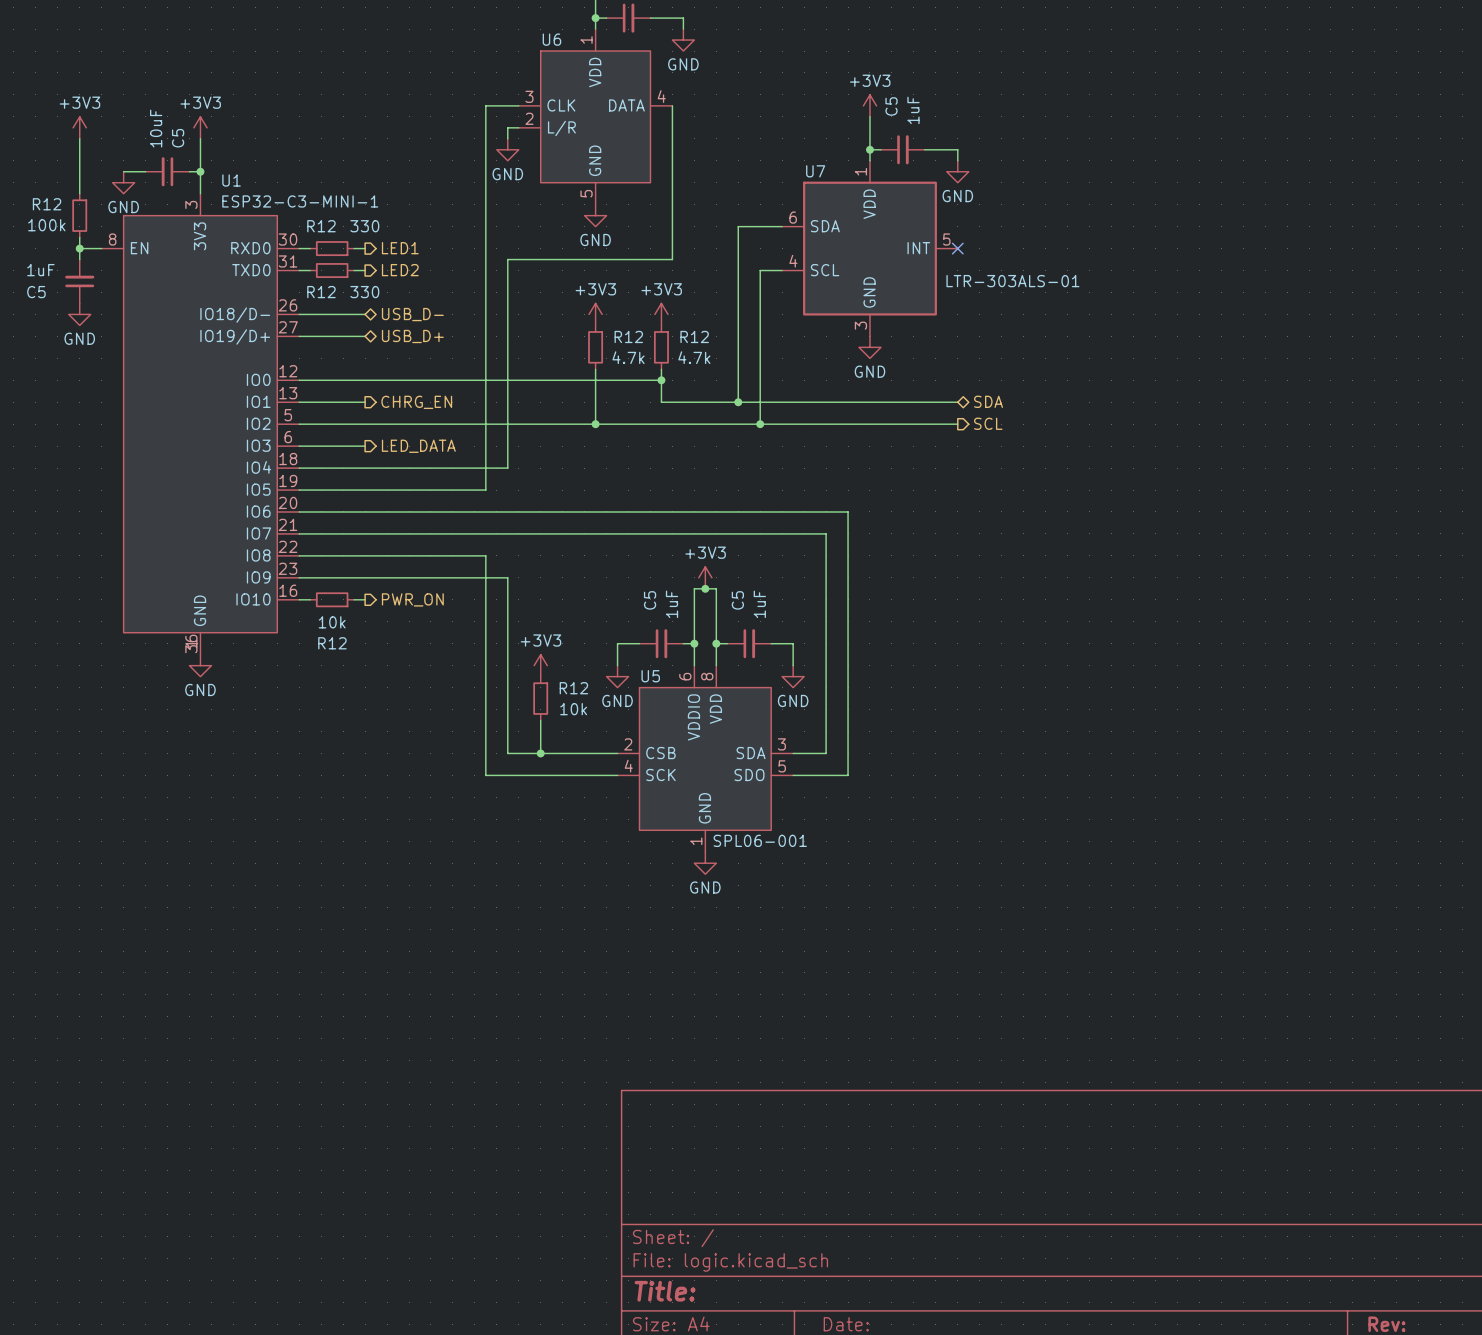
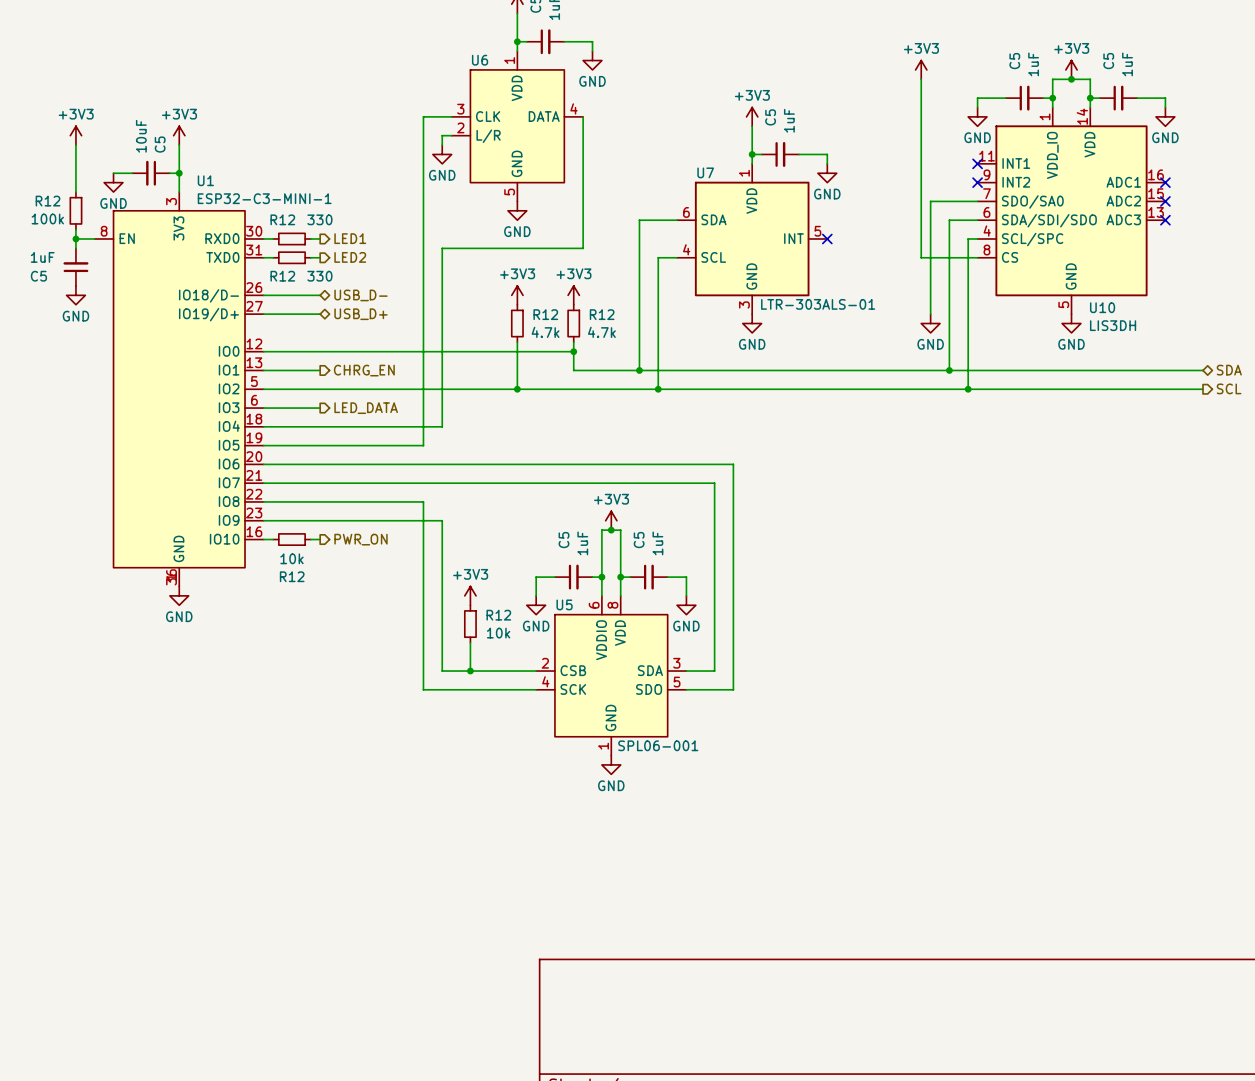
power symbol: none -> +3V3 (921, 69)
power symbol: none -> +3V3 (1071, 69)
wire: none -> (921, 79) (921, 257) (977, 257)
junction: none -> (1071, 79)
wire: none -> (1005, 98) (977, 98) (977, 107)
C5: none -> 1uF (1024, 98)
wire: none -> (1043, 98) (1052, 98)
junction: none -> (1052, 98)
wire: none -> (1090, 98) (1099, 98)
junction: none -> (1090, 98)
C5: none -> 1uF (1118, 98)
wire: none -> (1137, 98) (1165, 98) (1165, 107)
wire: none -> (1052, 107) (1052, 79) (1090, 79) (1090, 107)
power symbol: none -> GND (977, 116)
power symbol: none -> GND (1165, 116)
no-connect mark: none -> (977, 163)
no-connect mark: none -> (977, 182)
no-connect mark: none -> (1165, 182)
wire: none -> (977, 201) (930, 201) (930, 314)
no-connect mark: none -> (1165, 201)
U10: none -> LIS3DH (1071, 210)
wire: none -> (977, 220) (949, 220) (949, 370)
no-connect mark: none -> (1165, 220)
wire: none -> (977, 238) (968, 238) (968, 389)
U7 value position: LTR-303ALS-01 (1012, 281) -> LTR-303ALS-01 (818, 304)
power symbol: none -> GND (930, 323)
power symbol: none -> GND (1071, 323)
hierarchical label: SDA (988, 401) -> none
hierarchical label: none -> SDA (1229, 370)
wire: none -> (827, 370) (1202, 370)
junction: none -> (949, 370)
hierarchical label: SCL (988, 423) -> none
hierarchical label: none -> SCL (1229, 388)
wire: none -> (827, 389) (1202, 389)
junction: none -> (968, 389)

